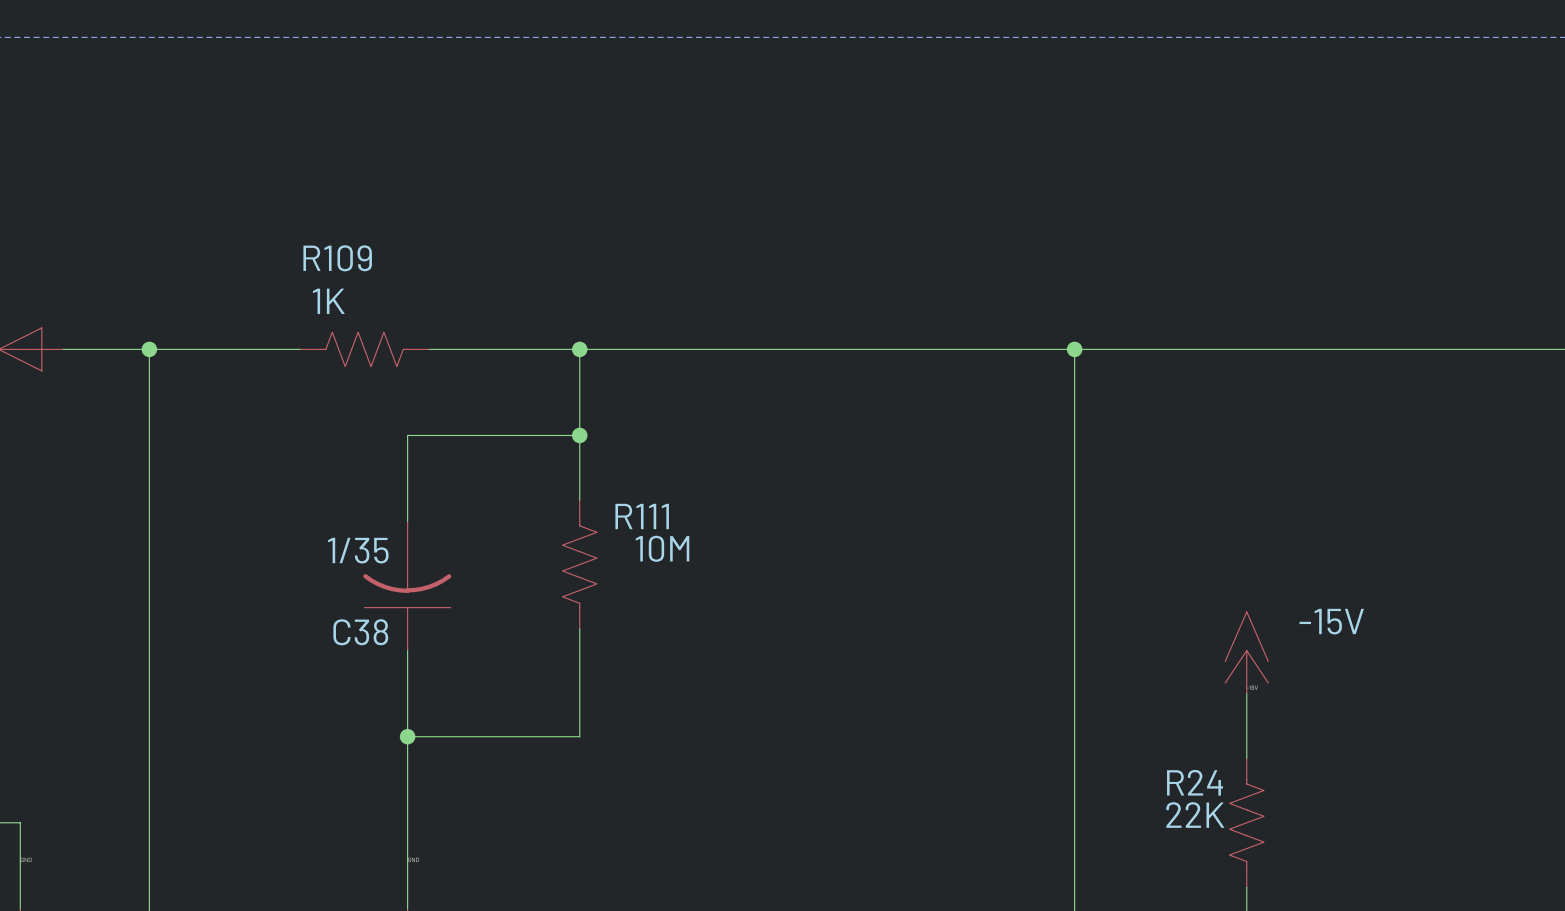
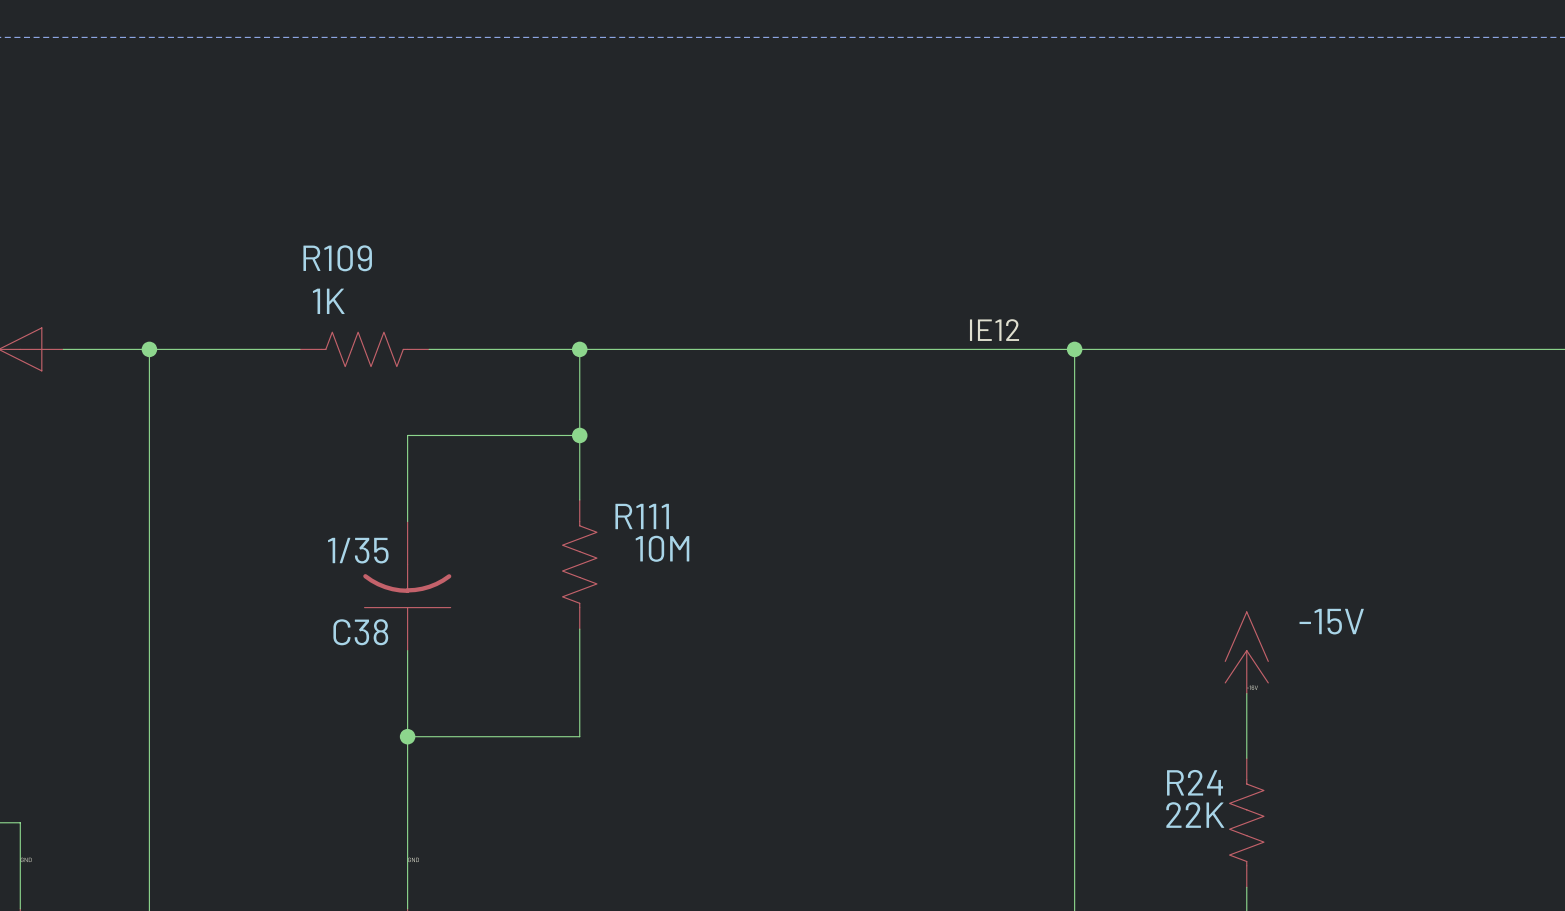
label: none -> IE12 (994, 330)

